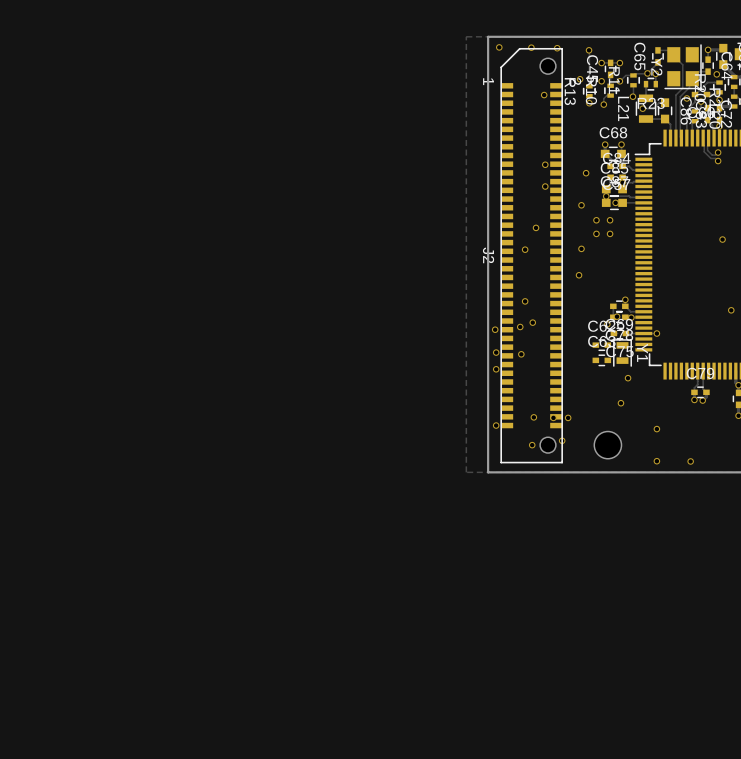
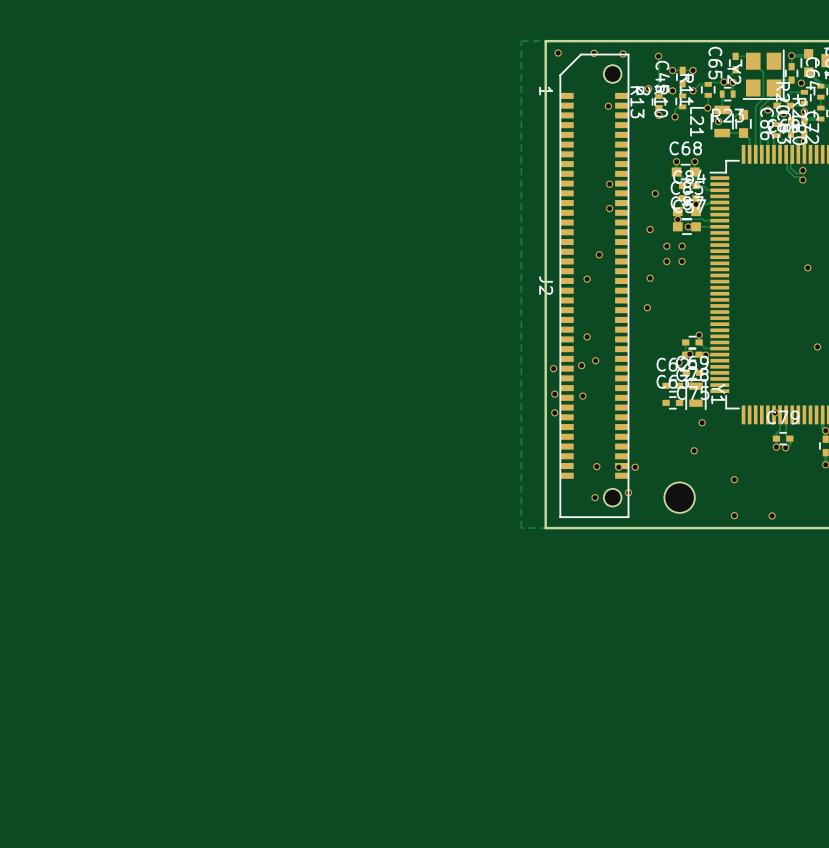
via position: (656, 333) -> (775, 412)
via: (496, 425) -> none

